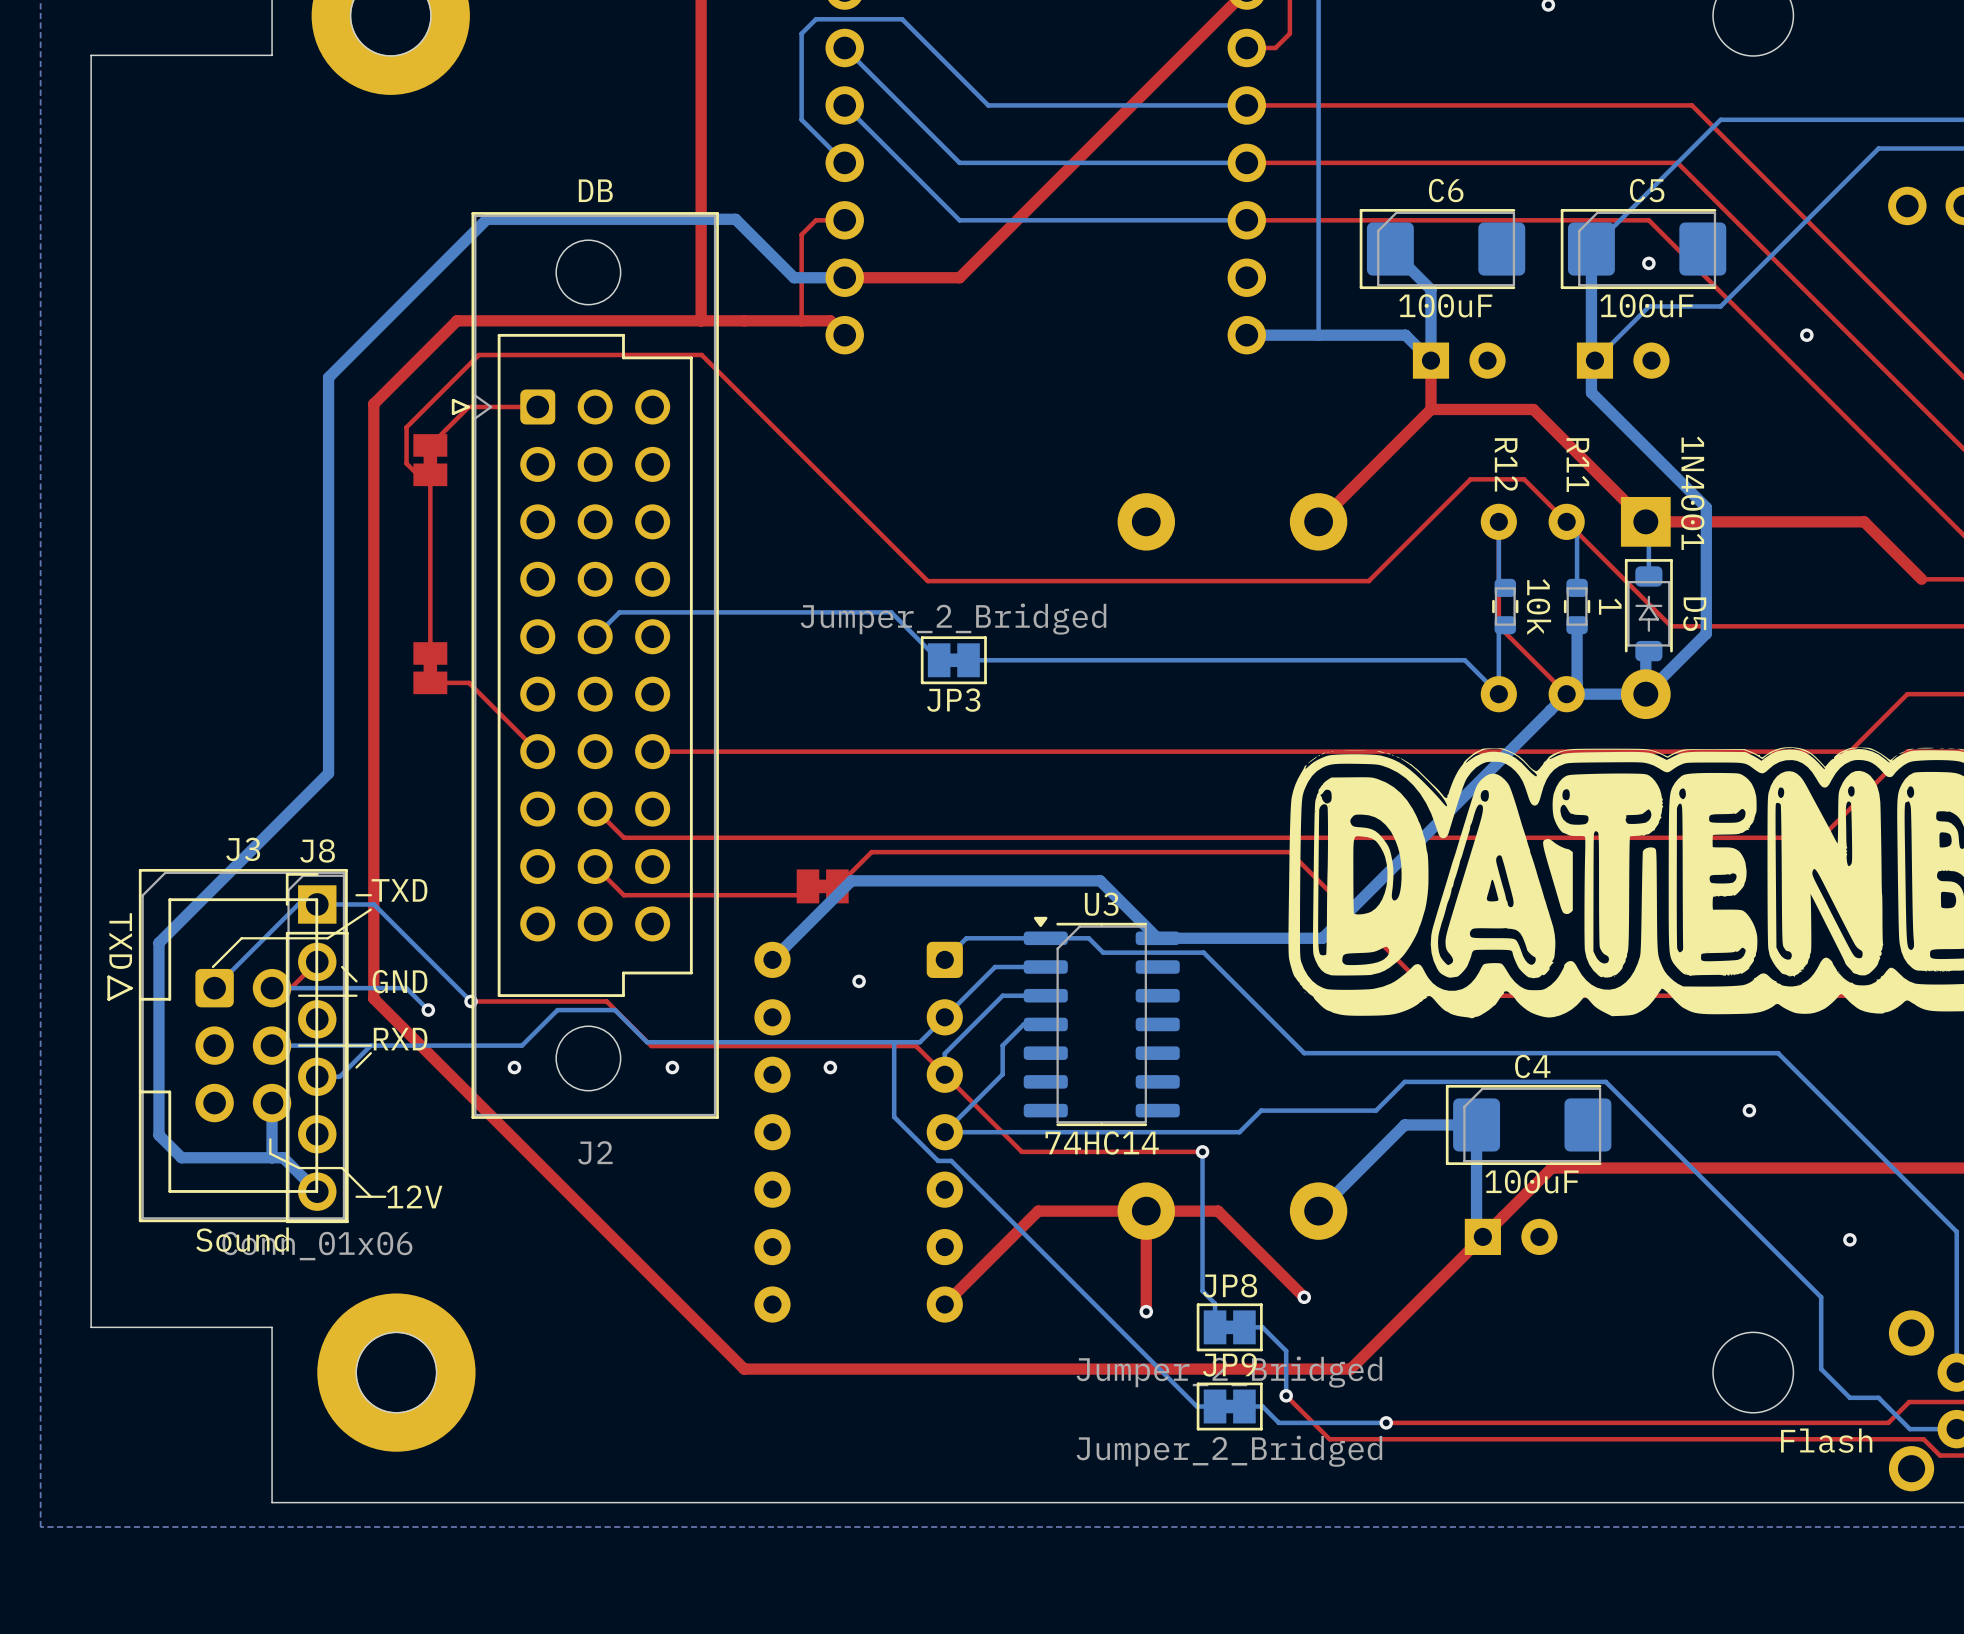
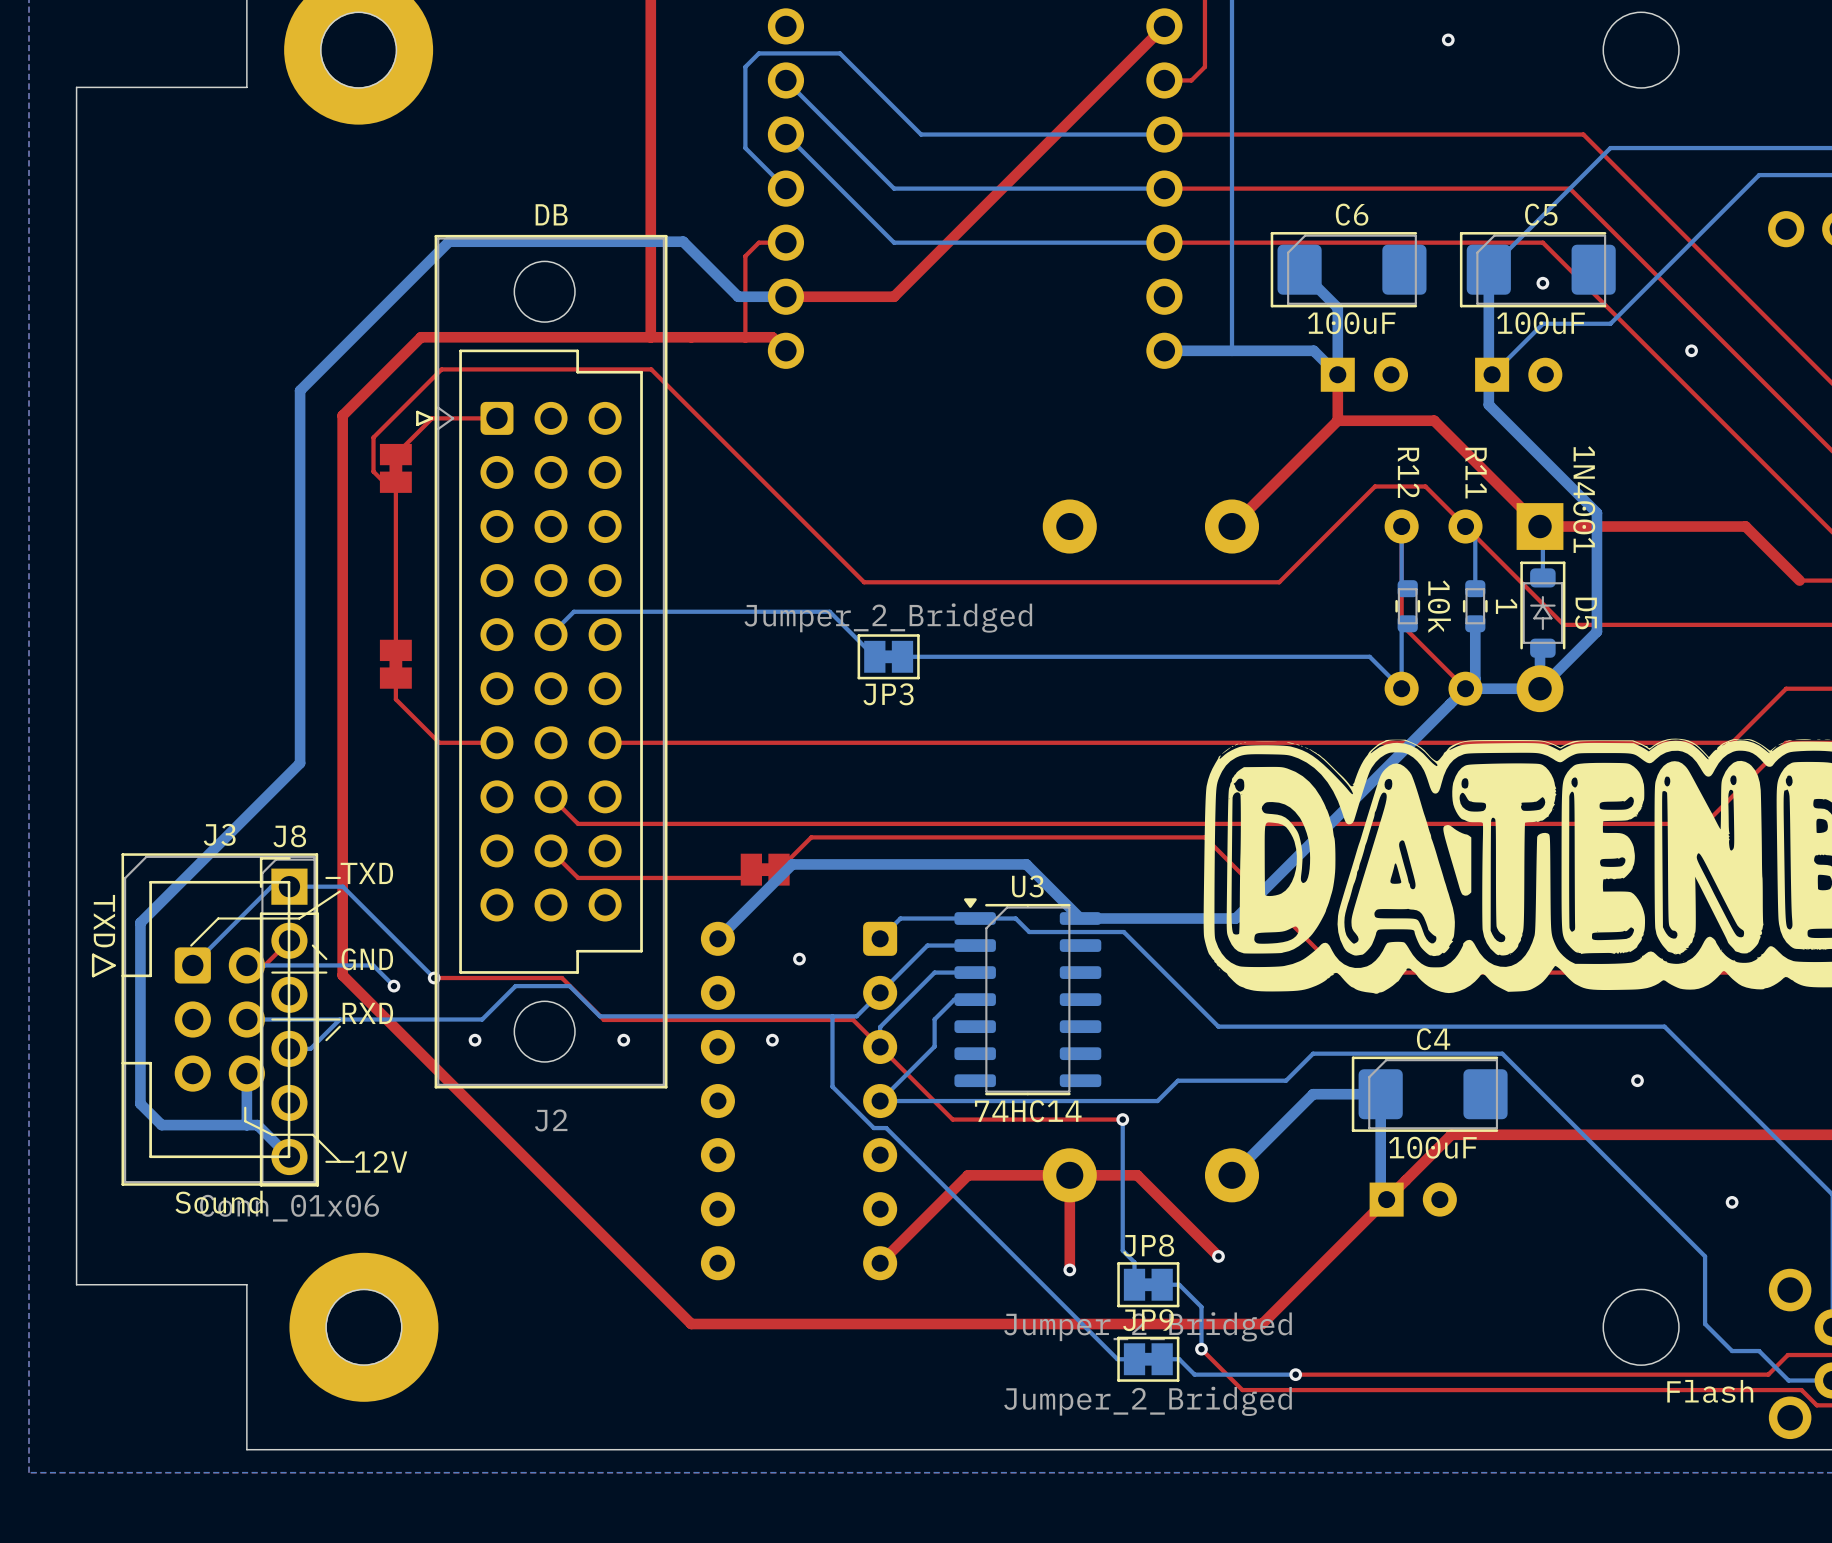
top track: (430, 682) (469, 682) (537, 751) -> (395, 678) (395, 699) (439, 742) (496, 742)

